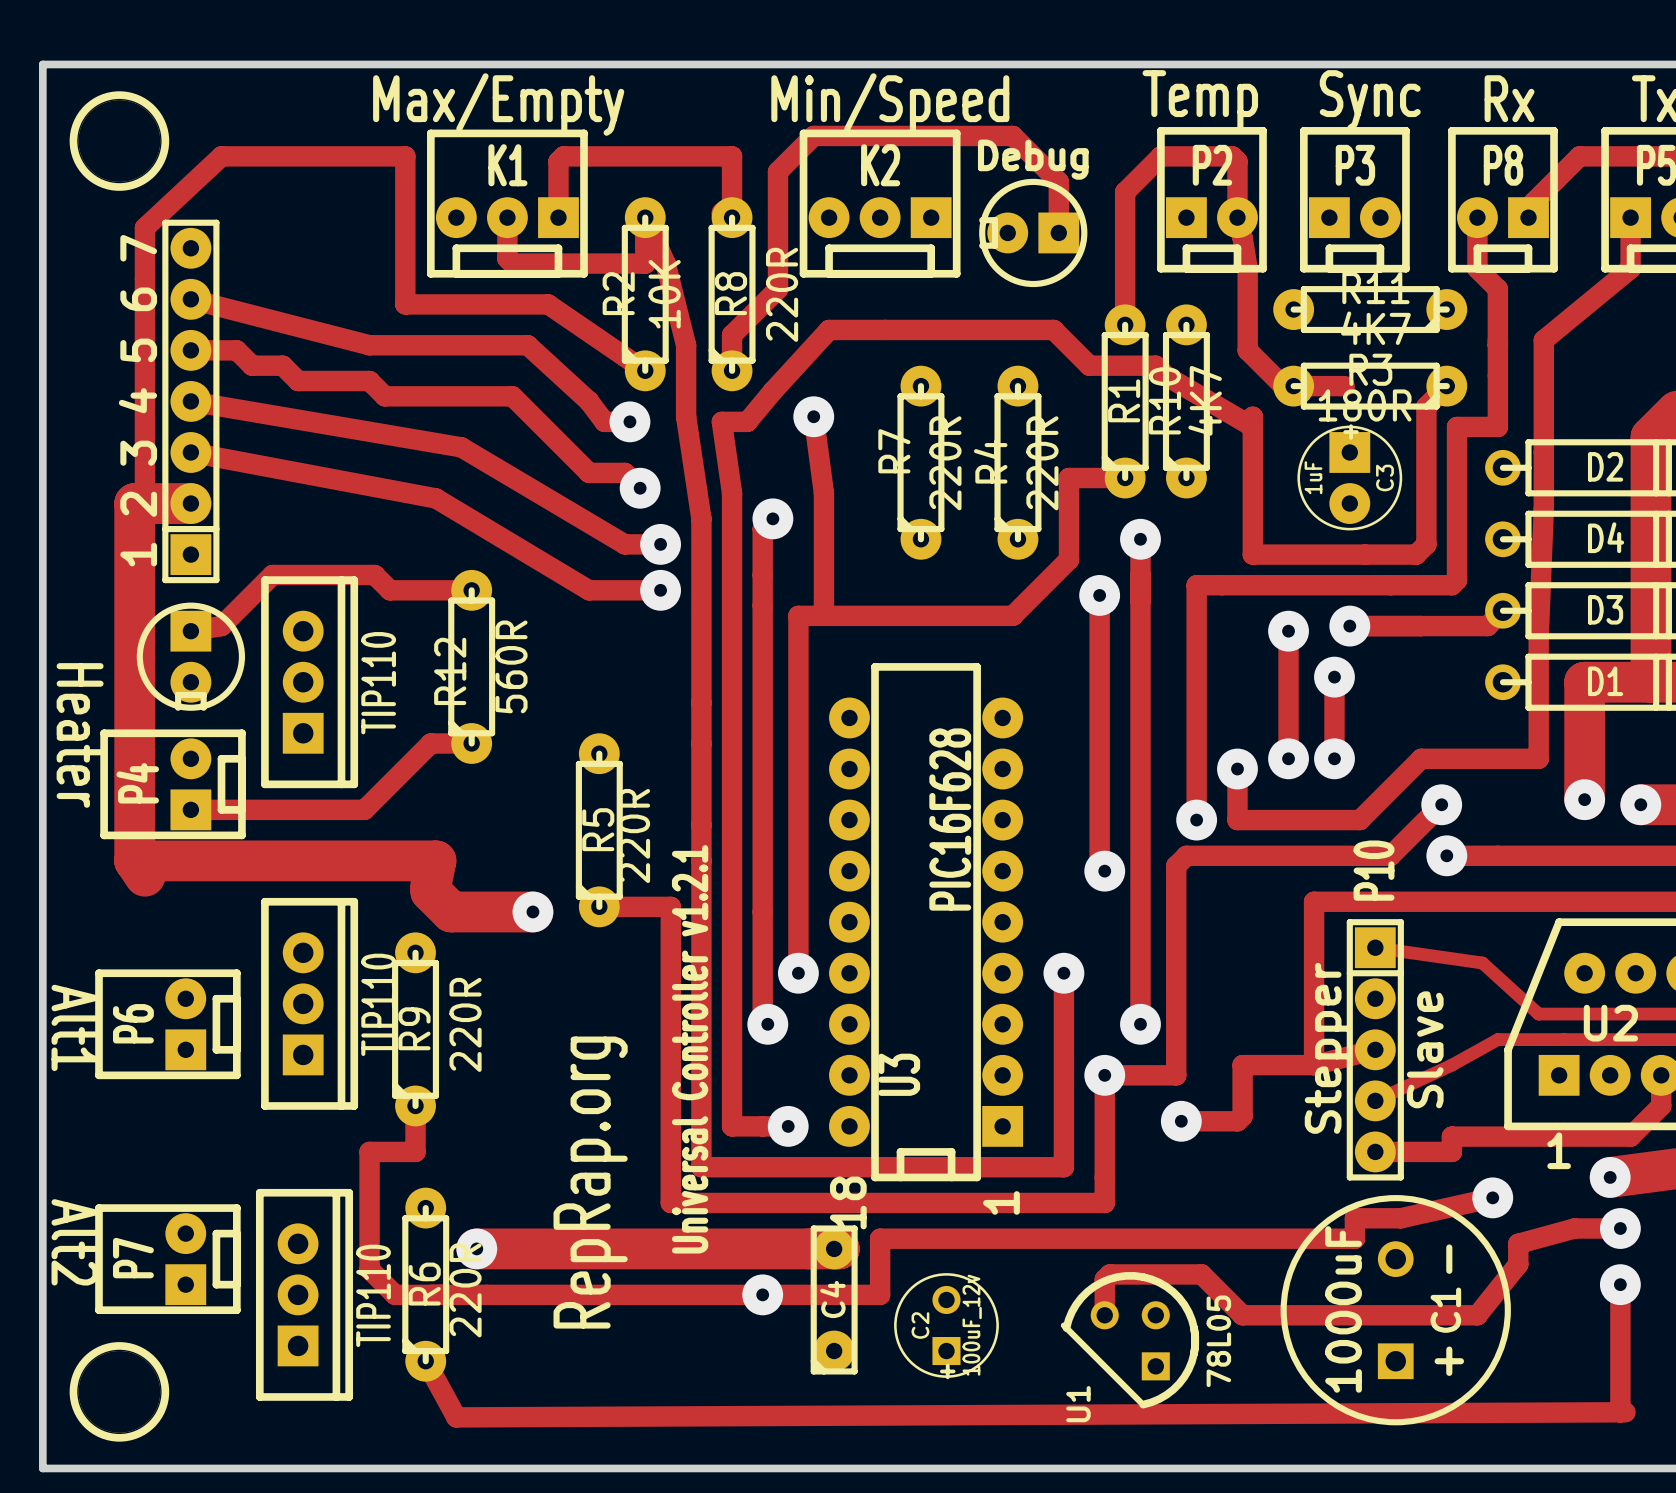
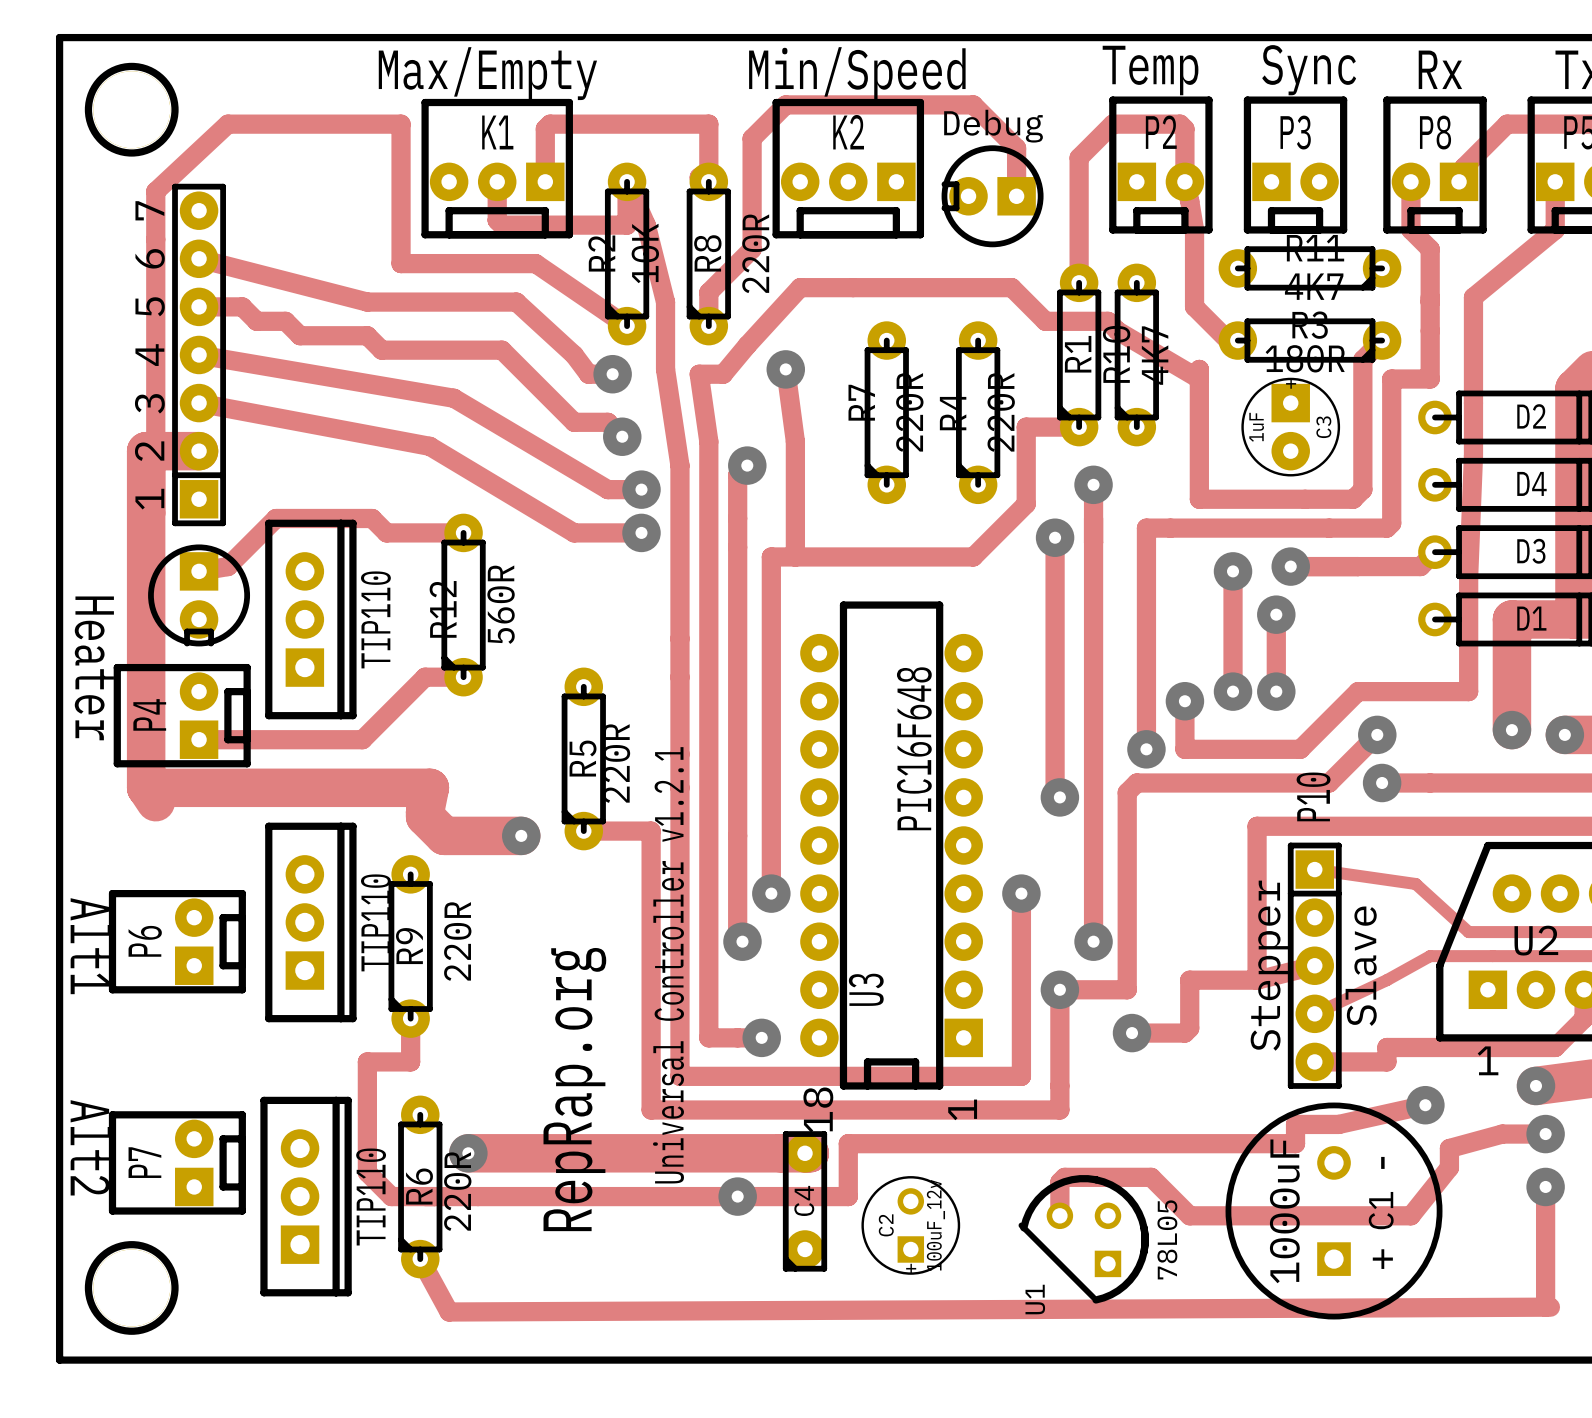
track: (1293, 386) (1344, 386) -> none
U3 value: PIC16F628 (950, 819) -> PIC16F648 (914, 748)

